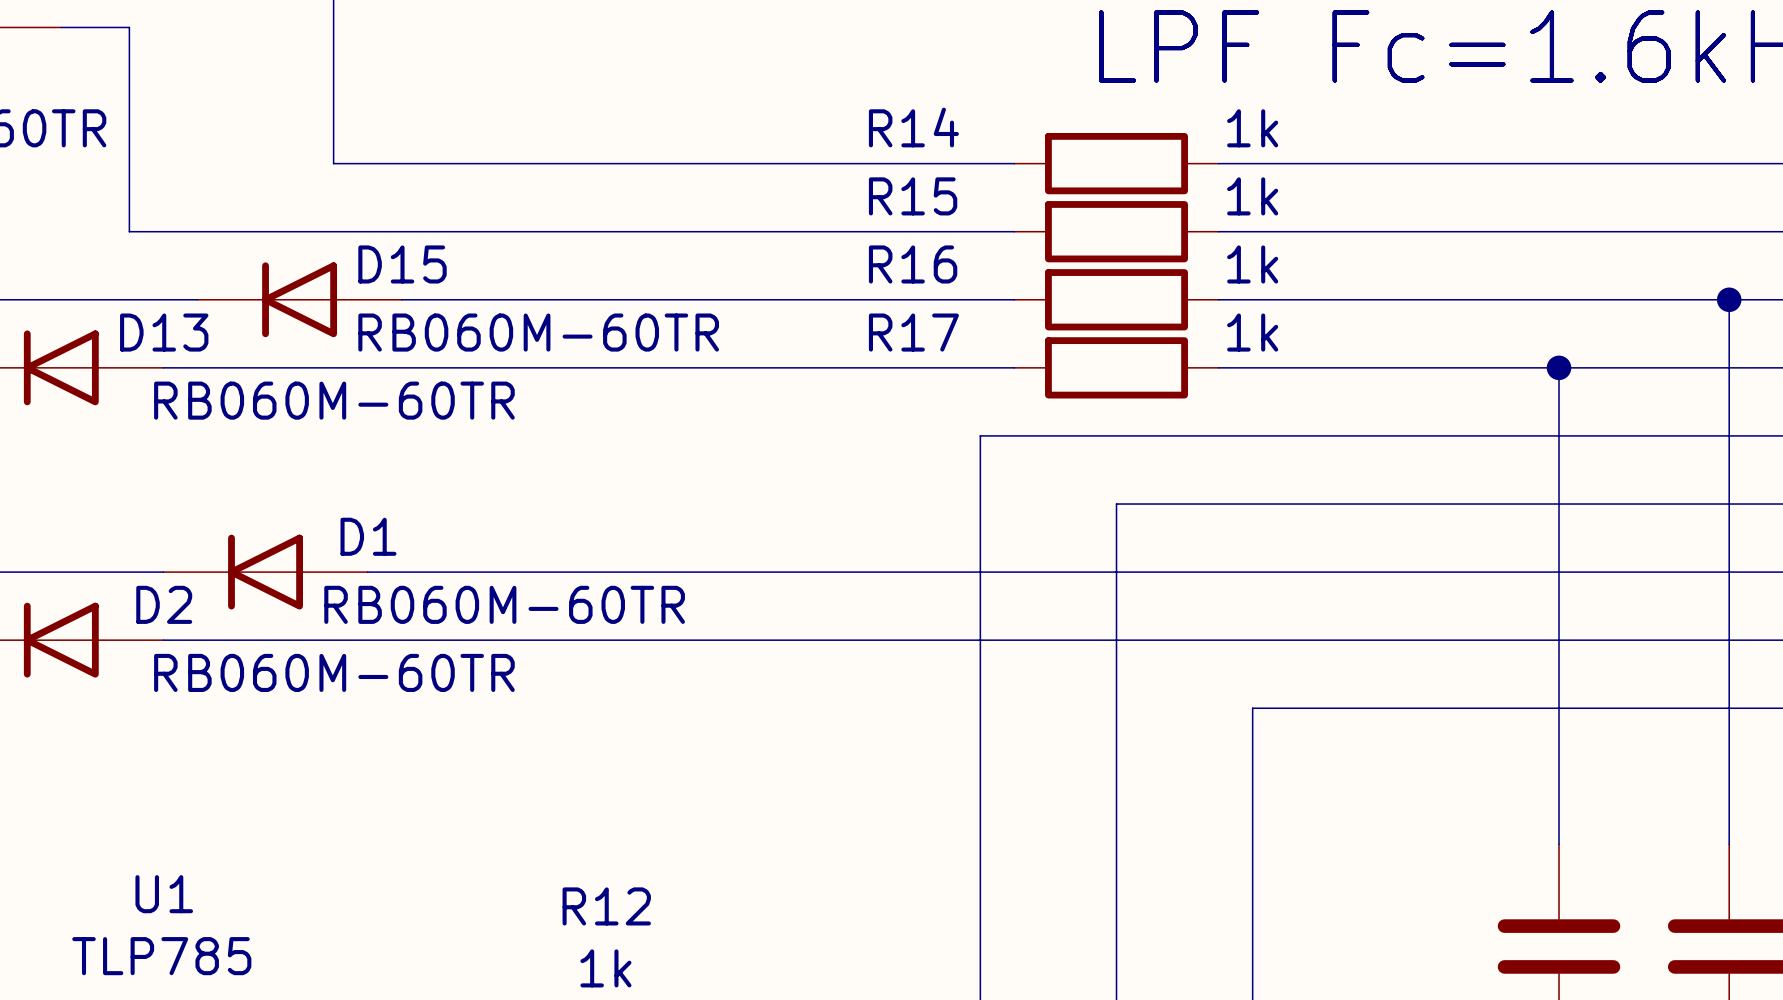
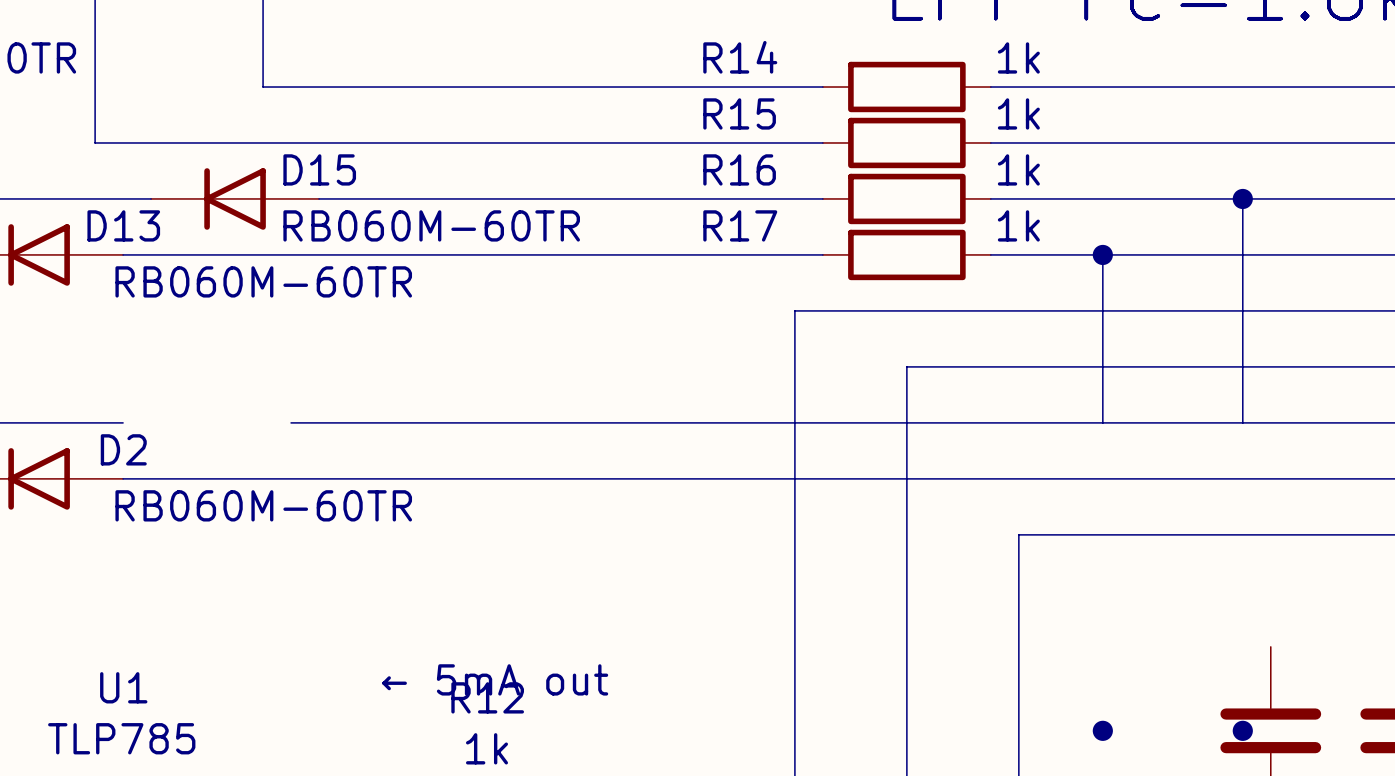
wire: none -> (1242, 198) (1242, 422)
wire: none -> (1102, 254) (1102, 422)
junction: none -> (1102, 254)
wire: (1559, 367) (1559, 844) -> none
junction position: (1559, 367) -> (1242, 198)
D1: RB060M-60TR (265, 572) -> none
text: none -> ← 5mA out (495, 679)
junction: none -> (1102, 730)
junction: none -> (1242, 730)

